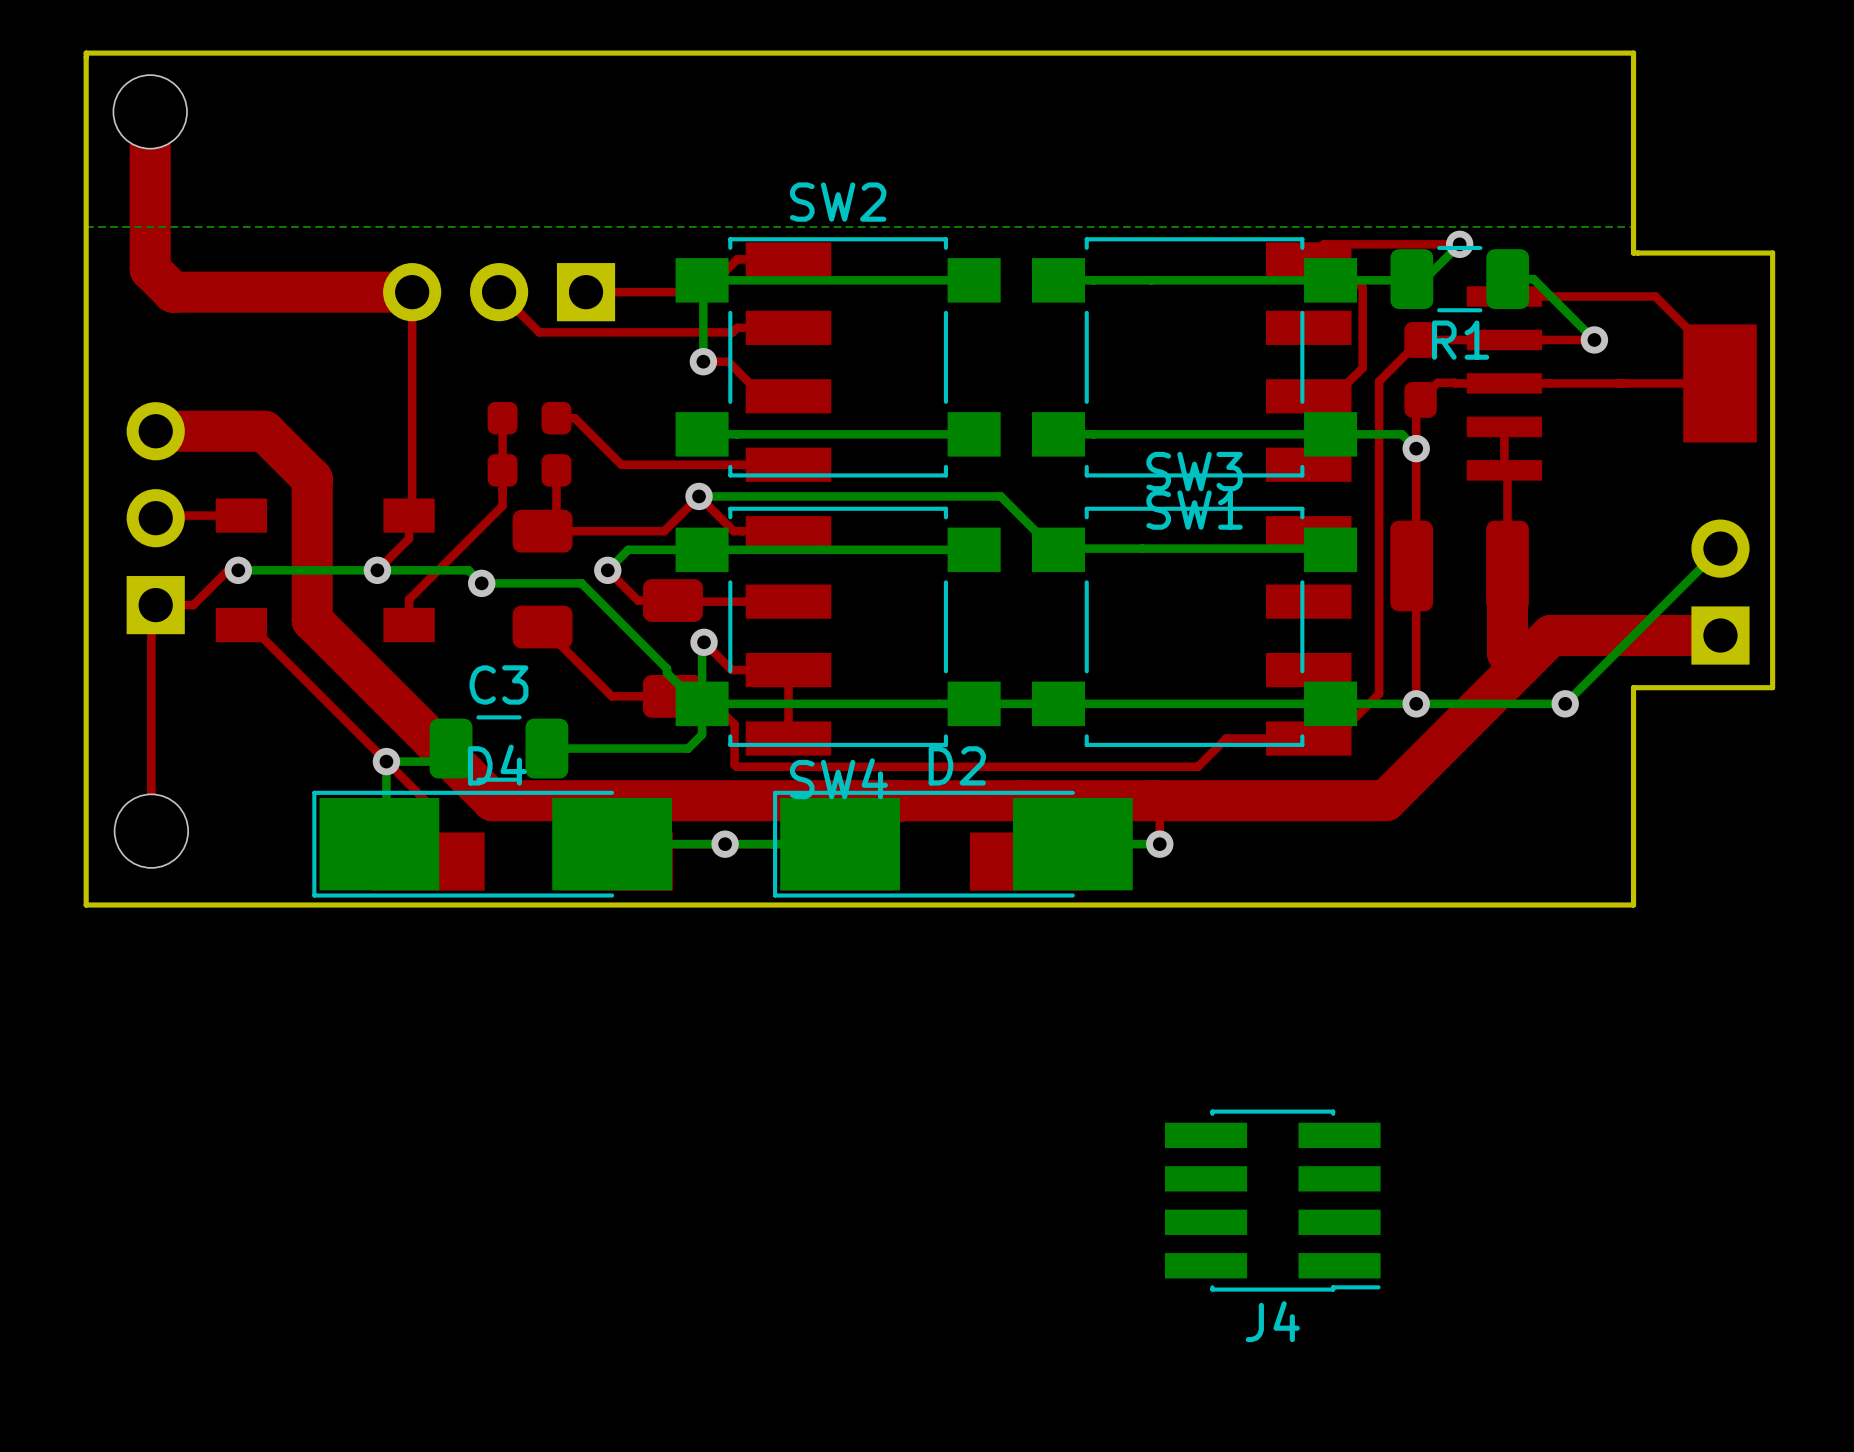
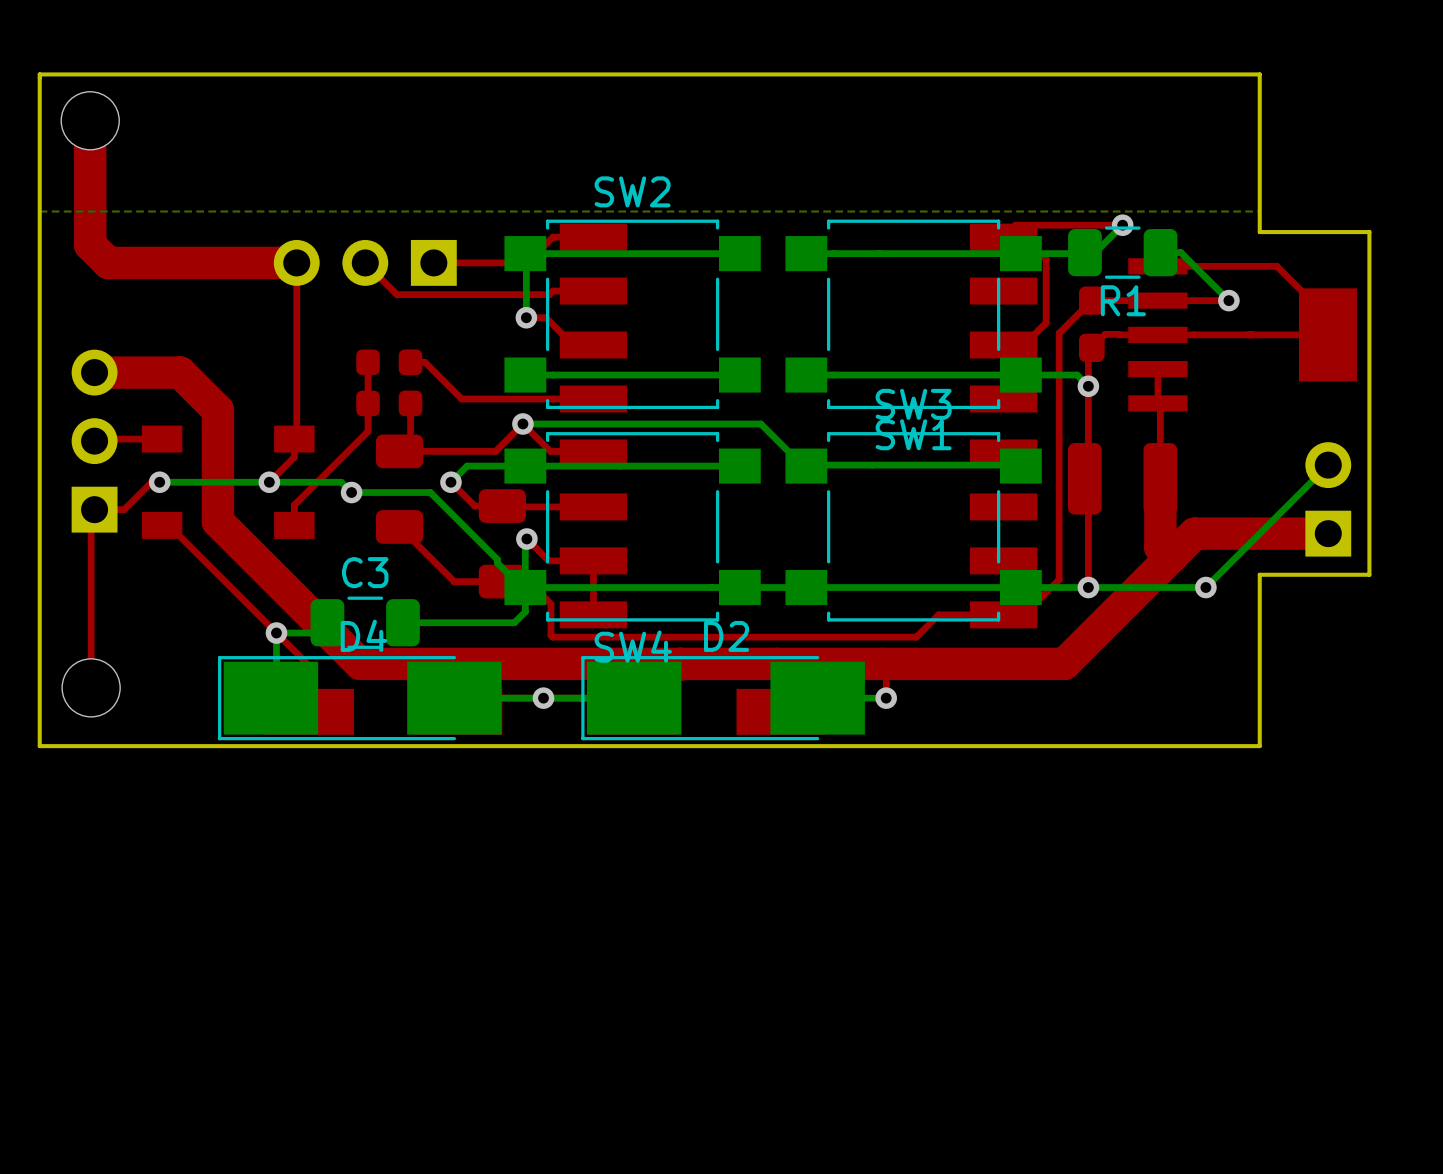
J4: (1272, 1200) -> none

